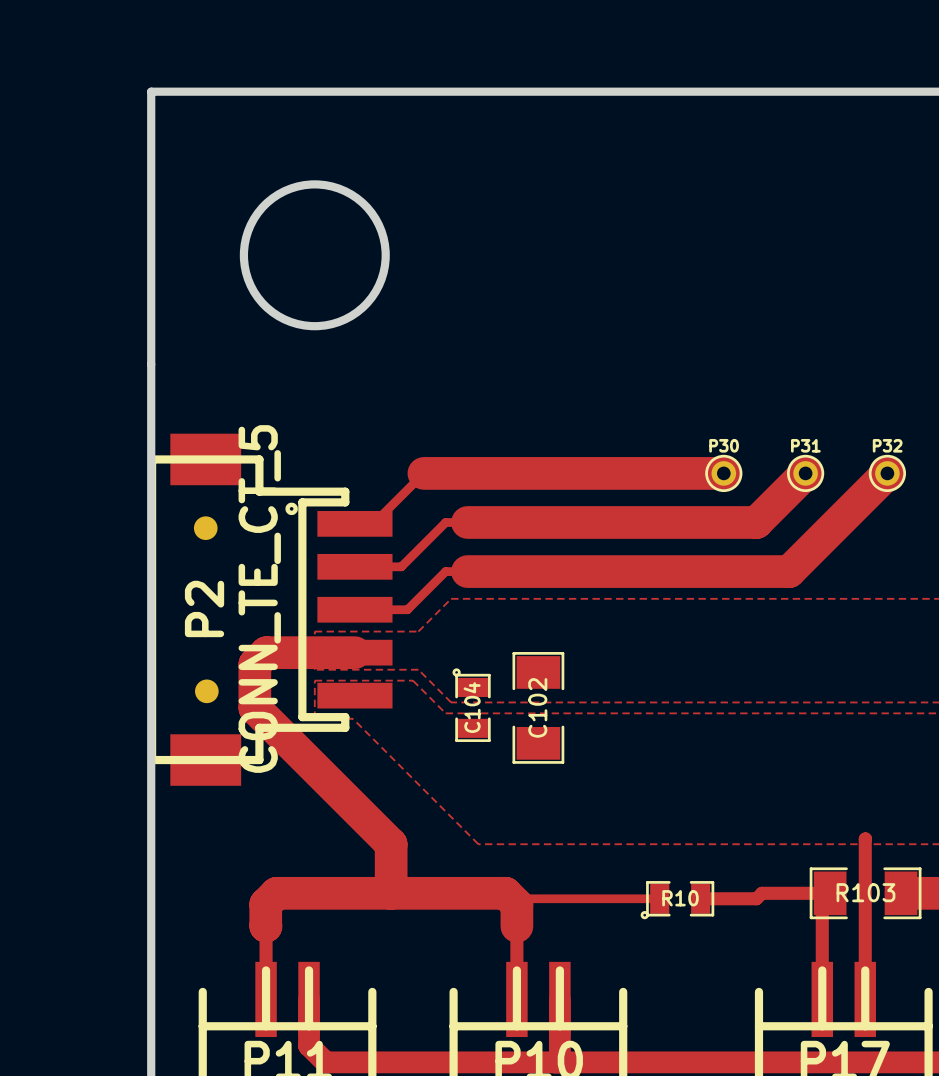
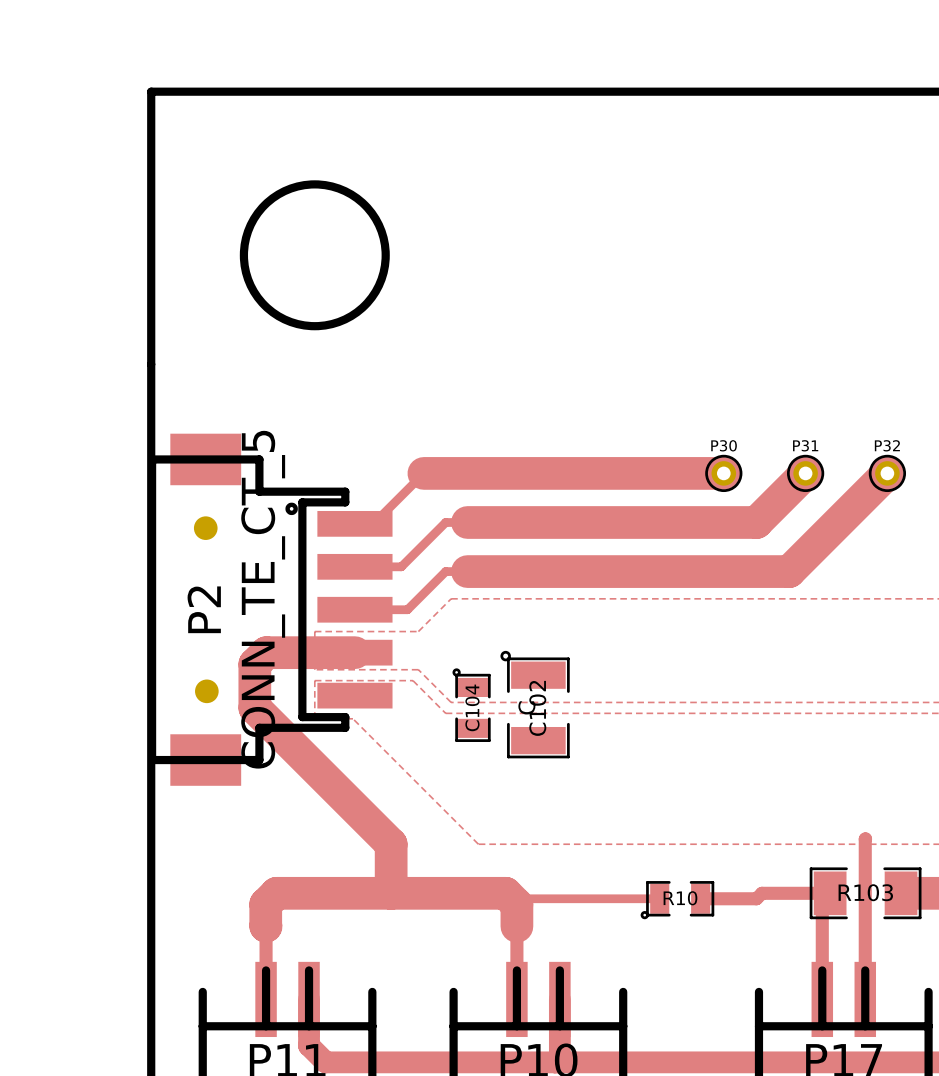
C102 footprint: [512, 652, 565, 764] -> [500, 650, 570, 759]
C102 value: none -> C (526, 707)

